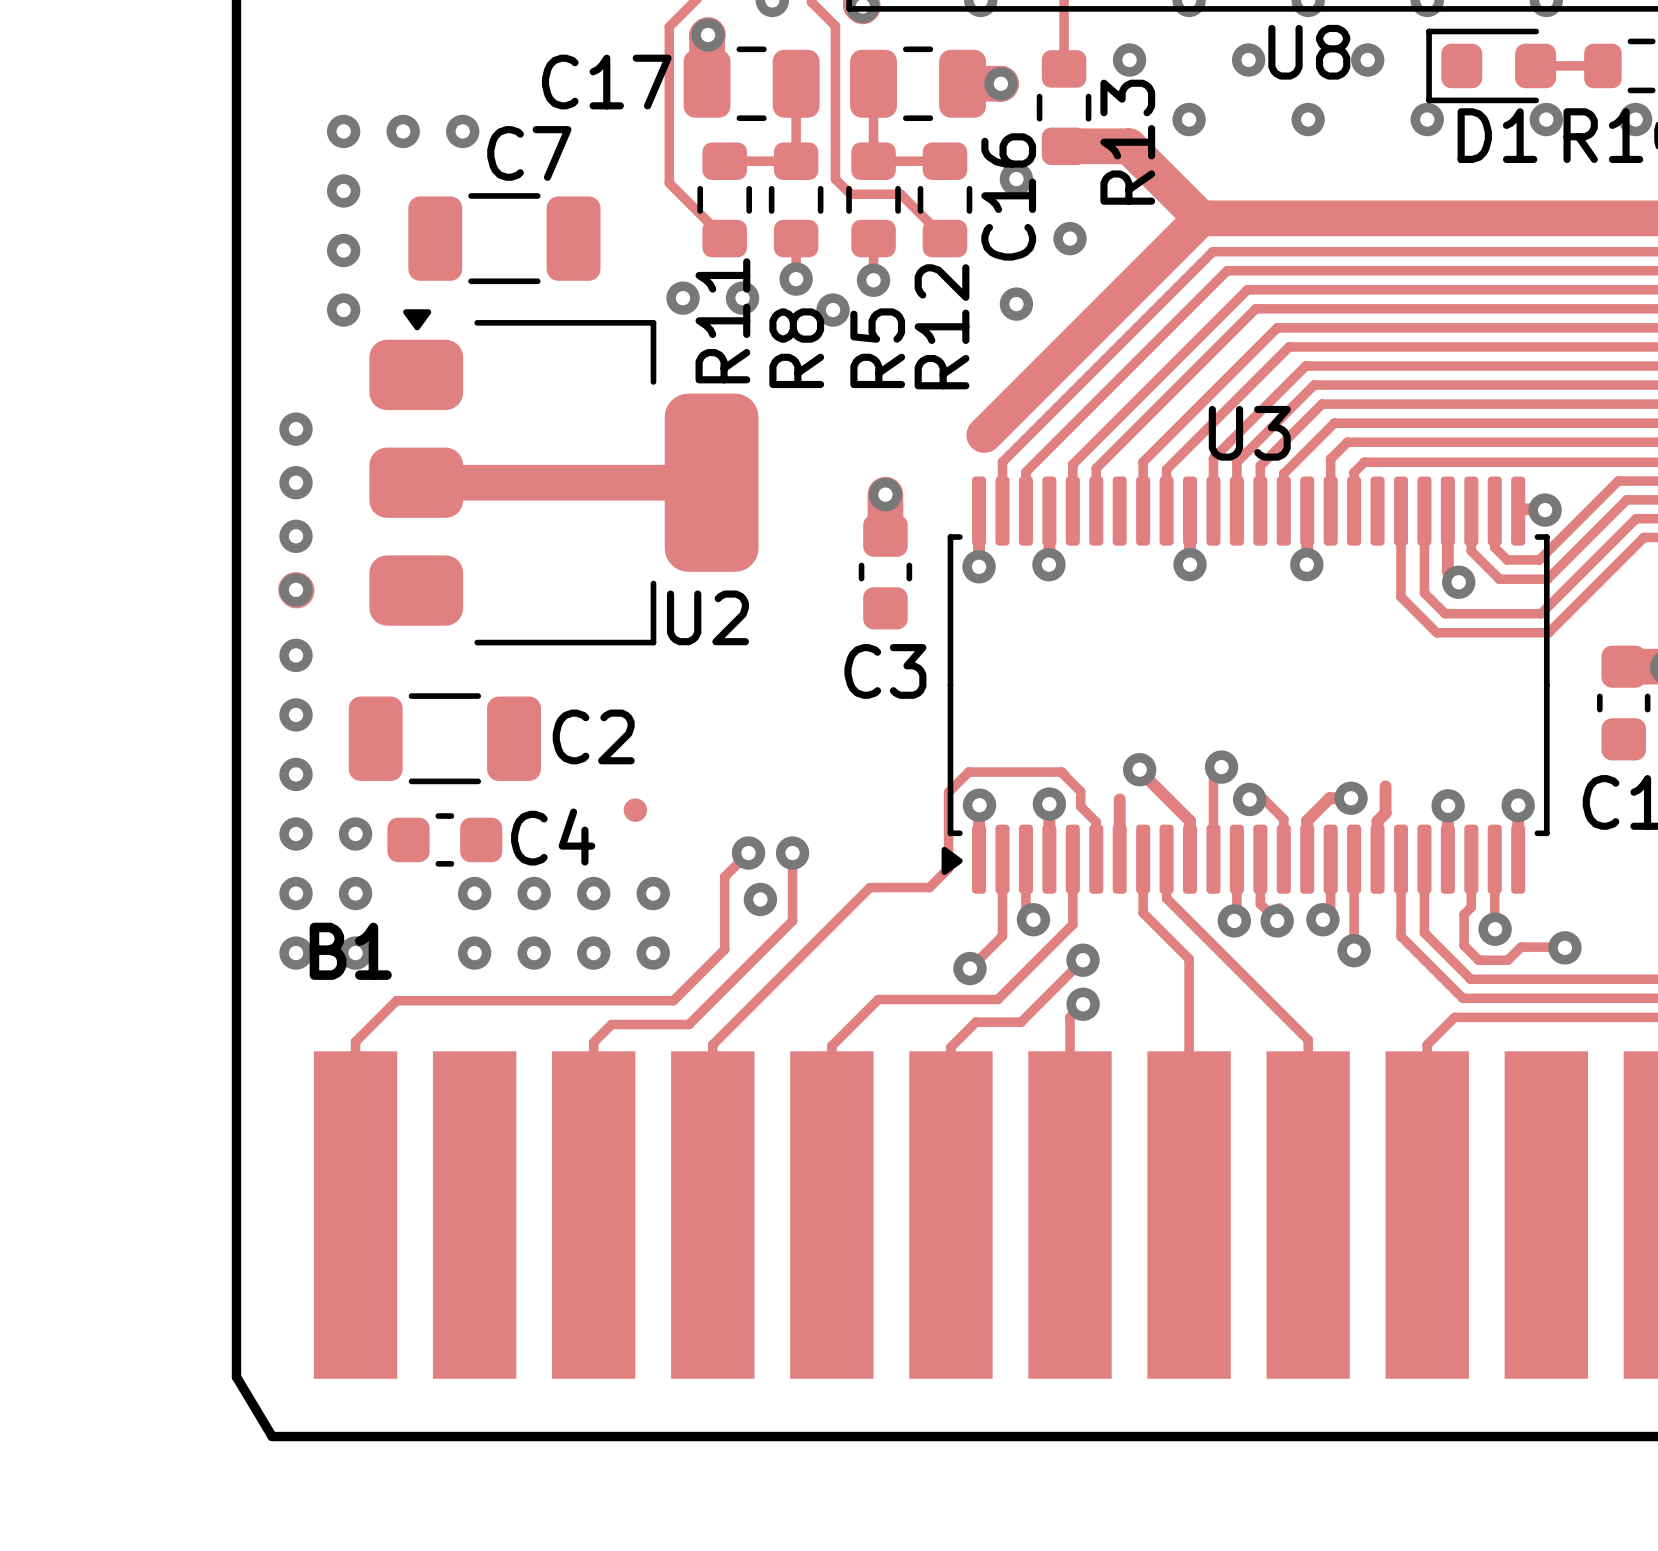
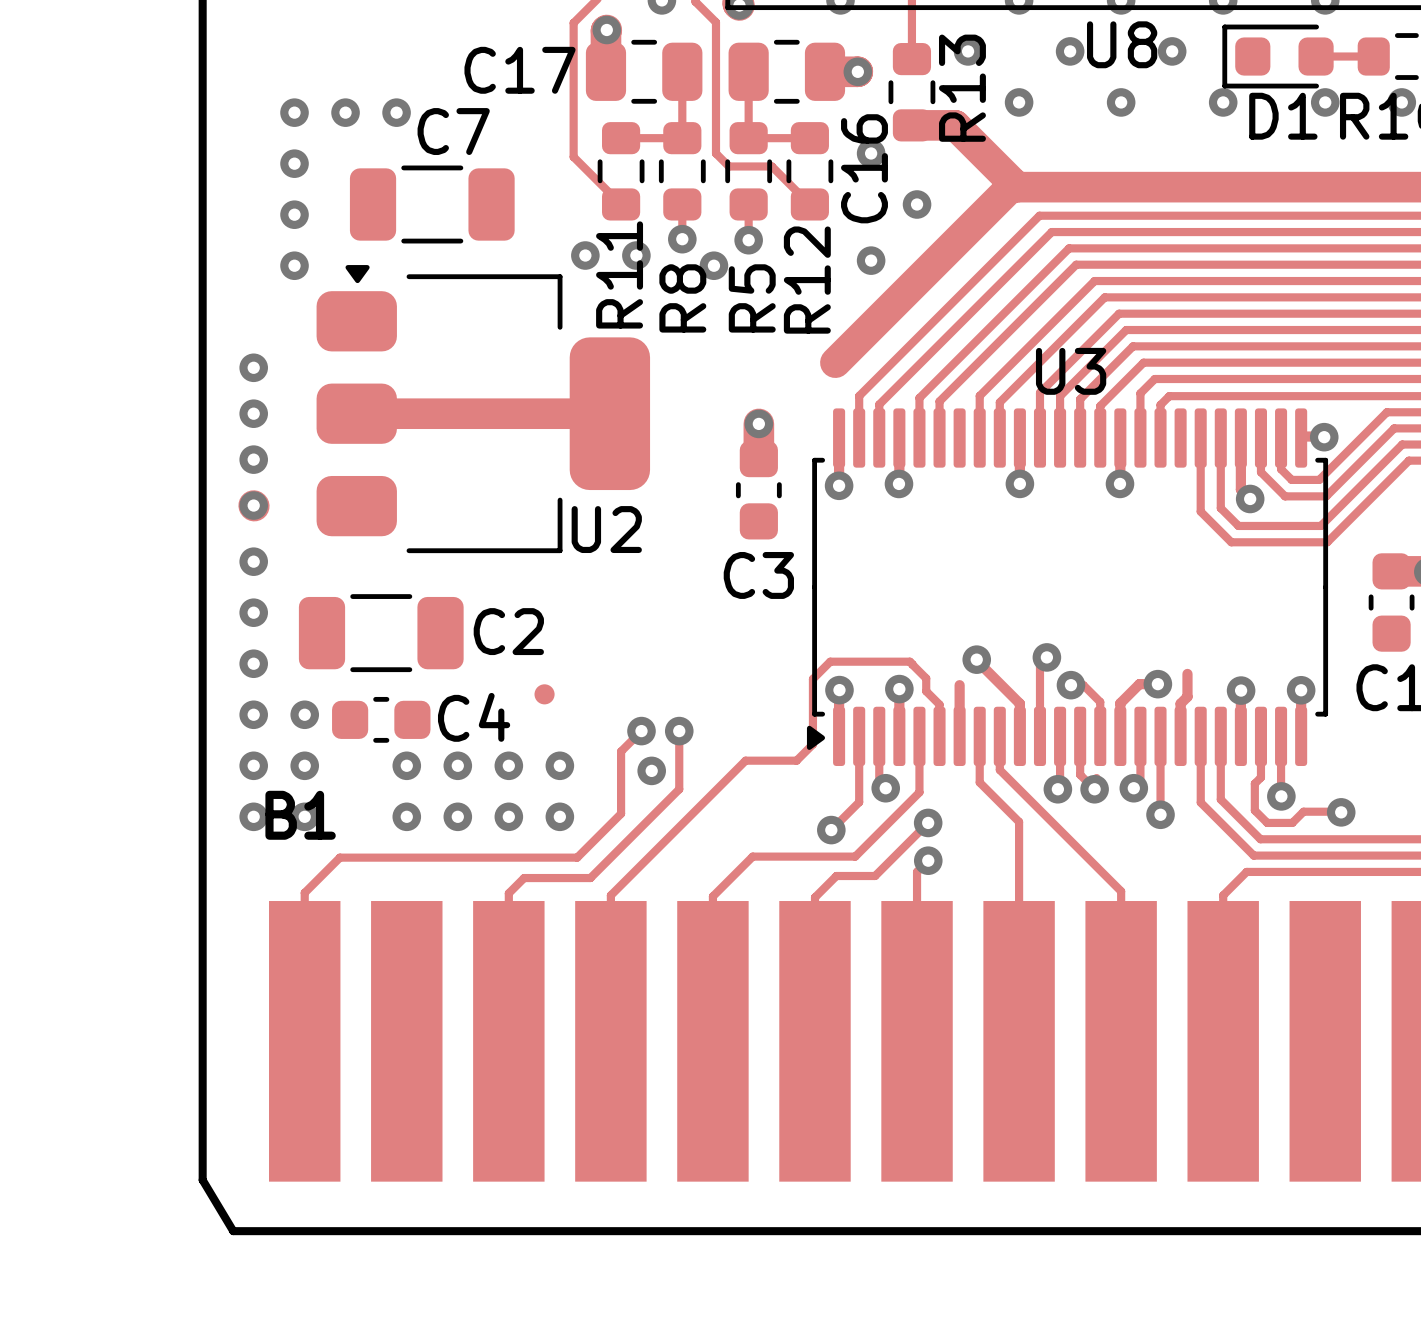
R13 name position: R13 (1127, 142) -> R13 (962, 88)
track: (1114, 146) (1128, 146) (1201, 218) (984, 435) -> (955, 125) (1017, 187) (1029, 187)
track: none -> (1013, 184) (835, 362)

